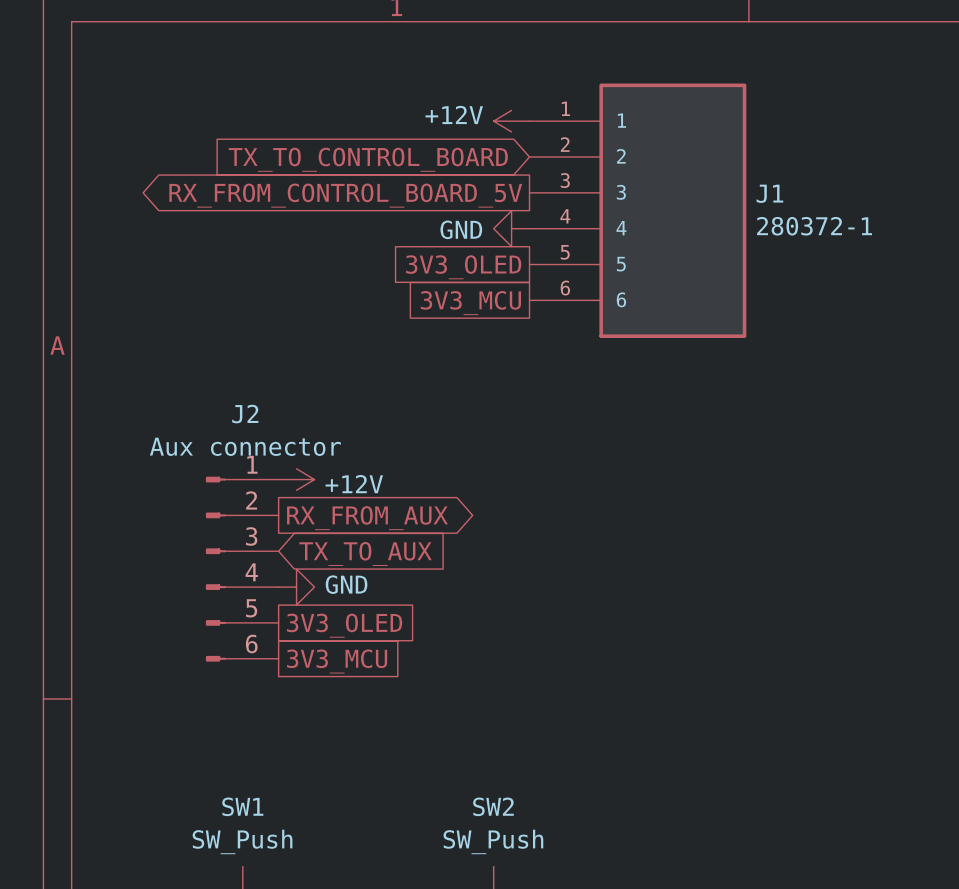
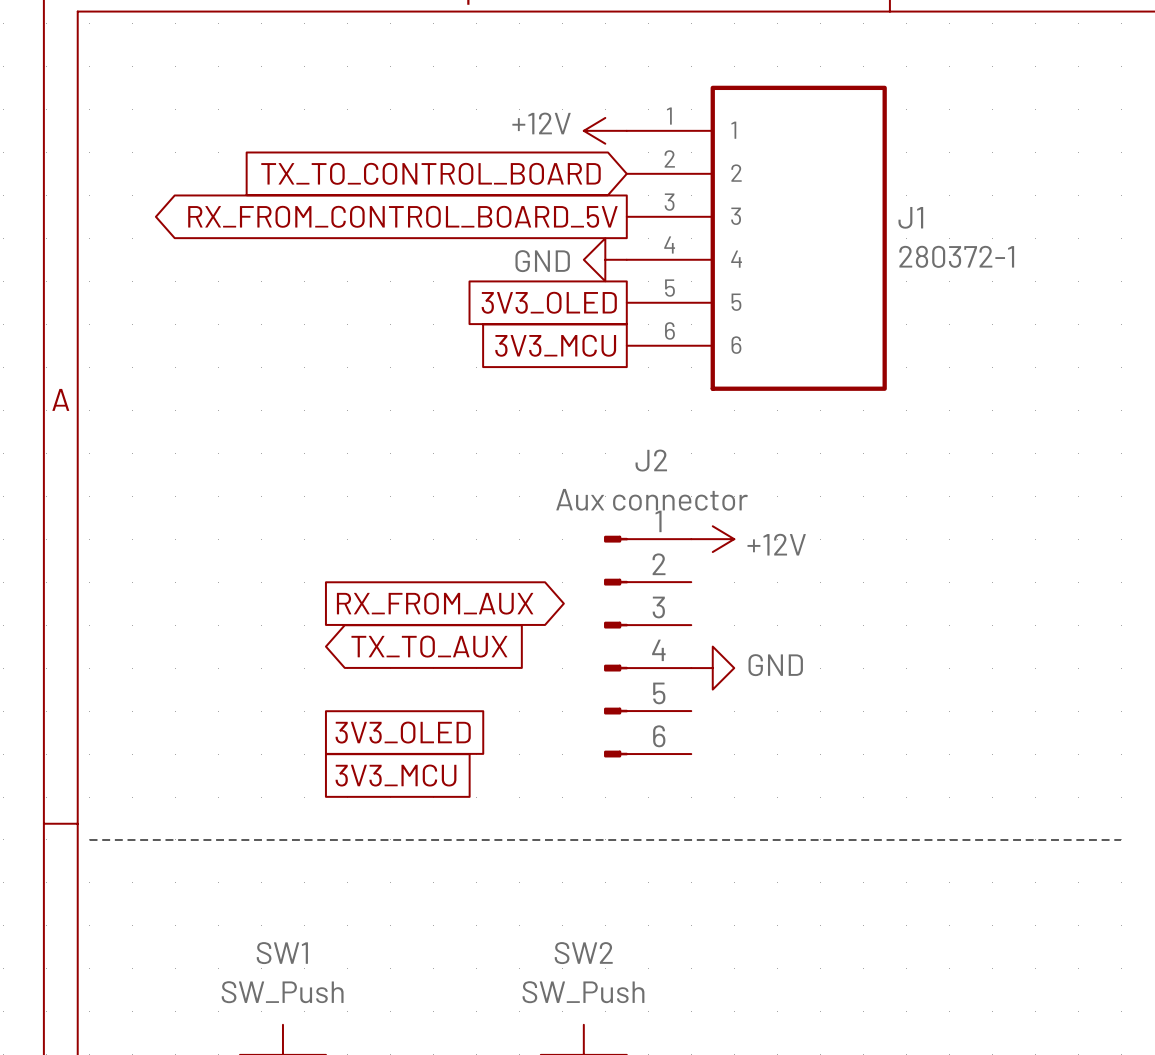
power symbol position: +12V (296, 479) -> +12V (712, 539)
J2 position: (242, 569) -> (647, 646)
power symbol position: GND (296, 587) -> GND (712, 668)
line: none -> (89, 839) (1121, 839)

